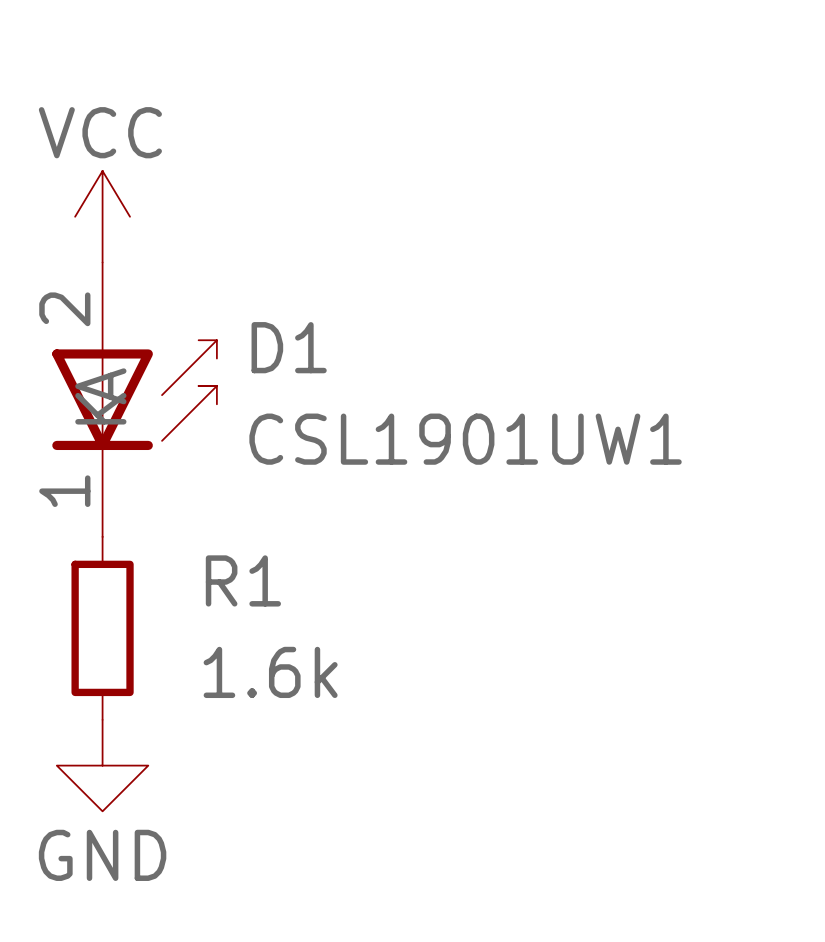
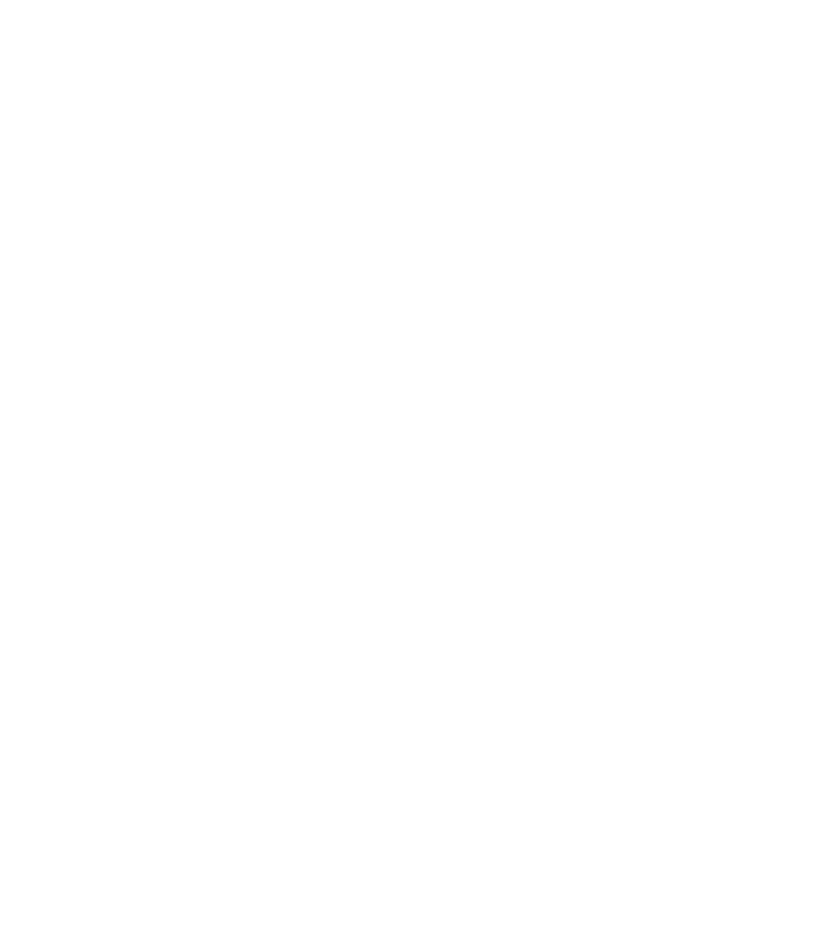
power symbol: VCC (102, 216) -> none
D1: CSL1901UW1 (134, 399) -> none
R1: 1.6k (102, 628) -> none
power symbol: GND (102, 765) -> none

